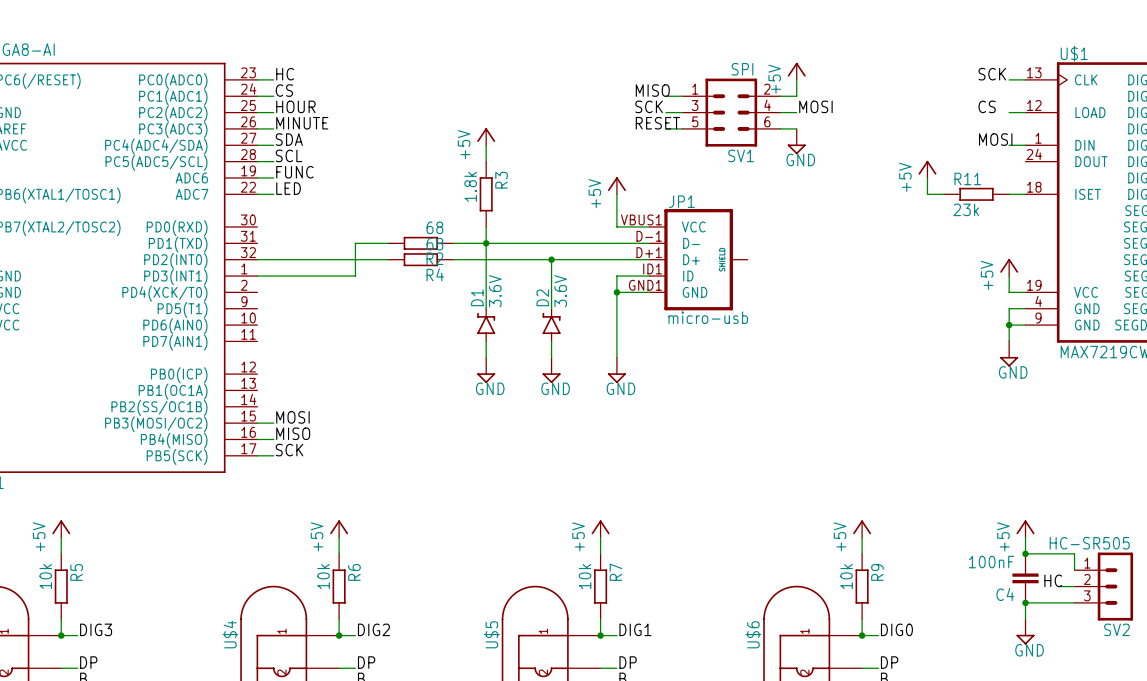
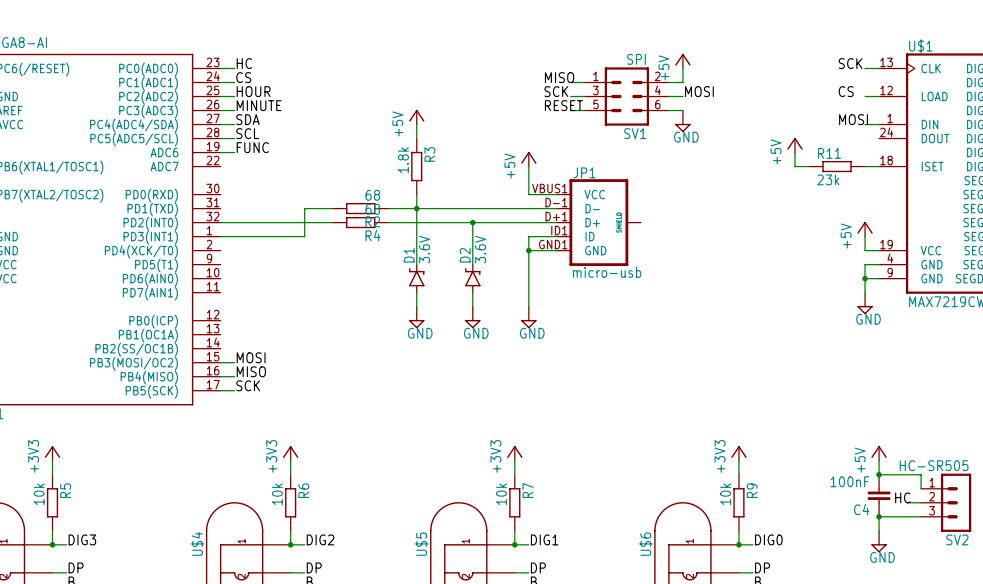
label: LED (288, 188) -> none
wire: (257, 194) (273, 194) -> none
power symbol: +5V (61, 528) -> +3V3 (52, 453)
power symbol: +5V (339, 528) -> +3V3 (290, 453)
power symbol: +5V (600, 528) -> +3V3 (514, 453)
power symbol: +5V (862, 528) -> +3V3 (738, 453)

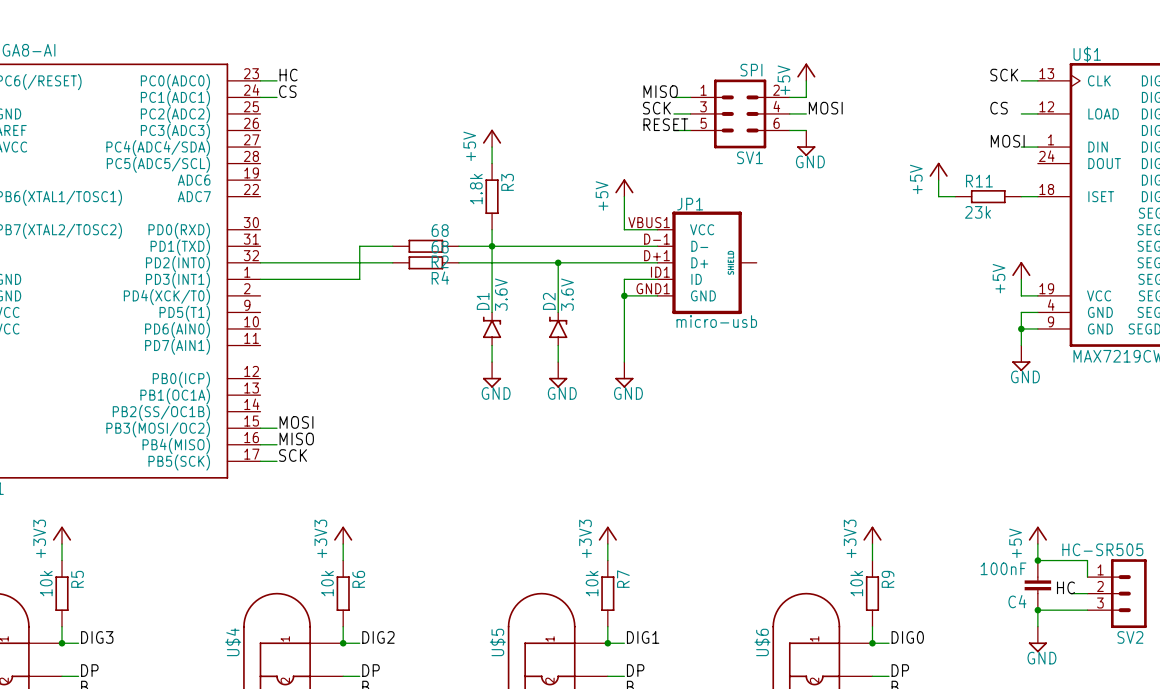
label: HOUR (253, 91) -> none
wire: (220, 96) (234, 96) -> none
label: MINUTE (259, 105) -> none
wire: (220, 110) (234, 110) -> none
label: SDA (247, 119) -> none
wire: (220, 124) (234, 124) -> none
label: SCL (247, 133) -> none
wire: (220, 138) (234, 138) -> none
label: FUNC (252, 147) -> none
wire: (220, 152) (234, 152) -> none

